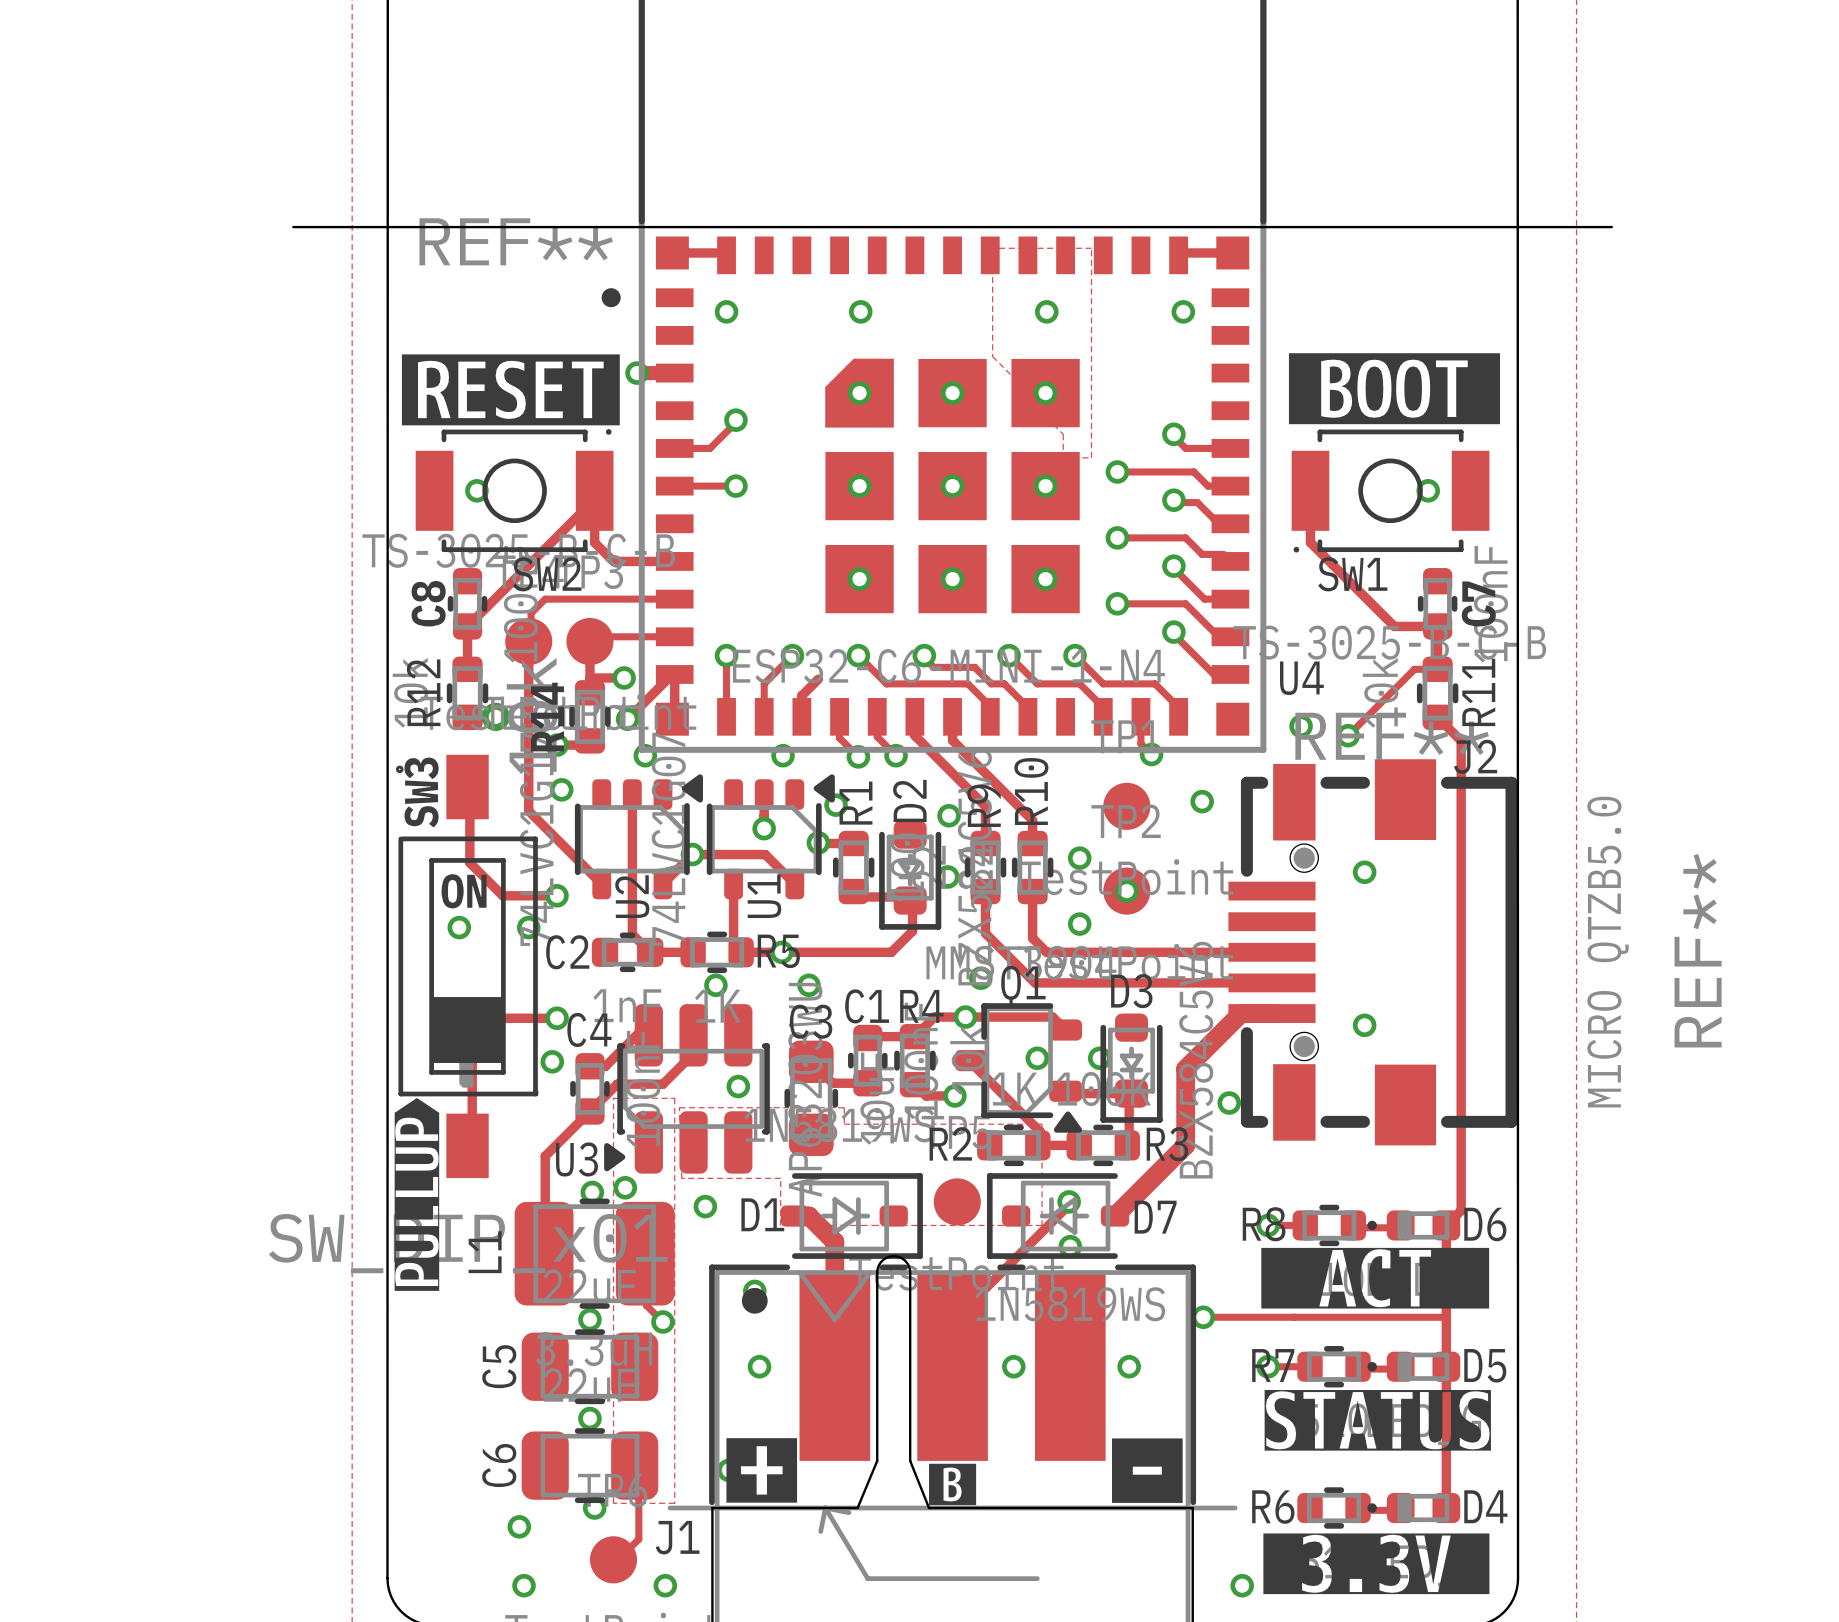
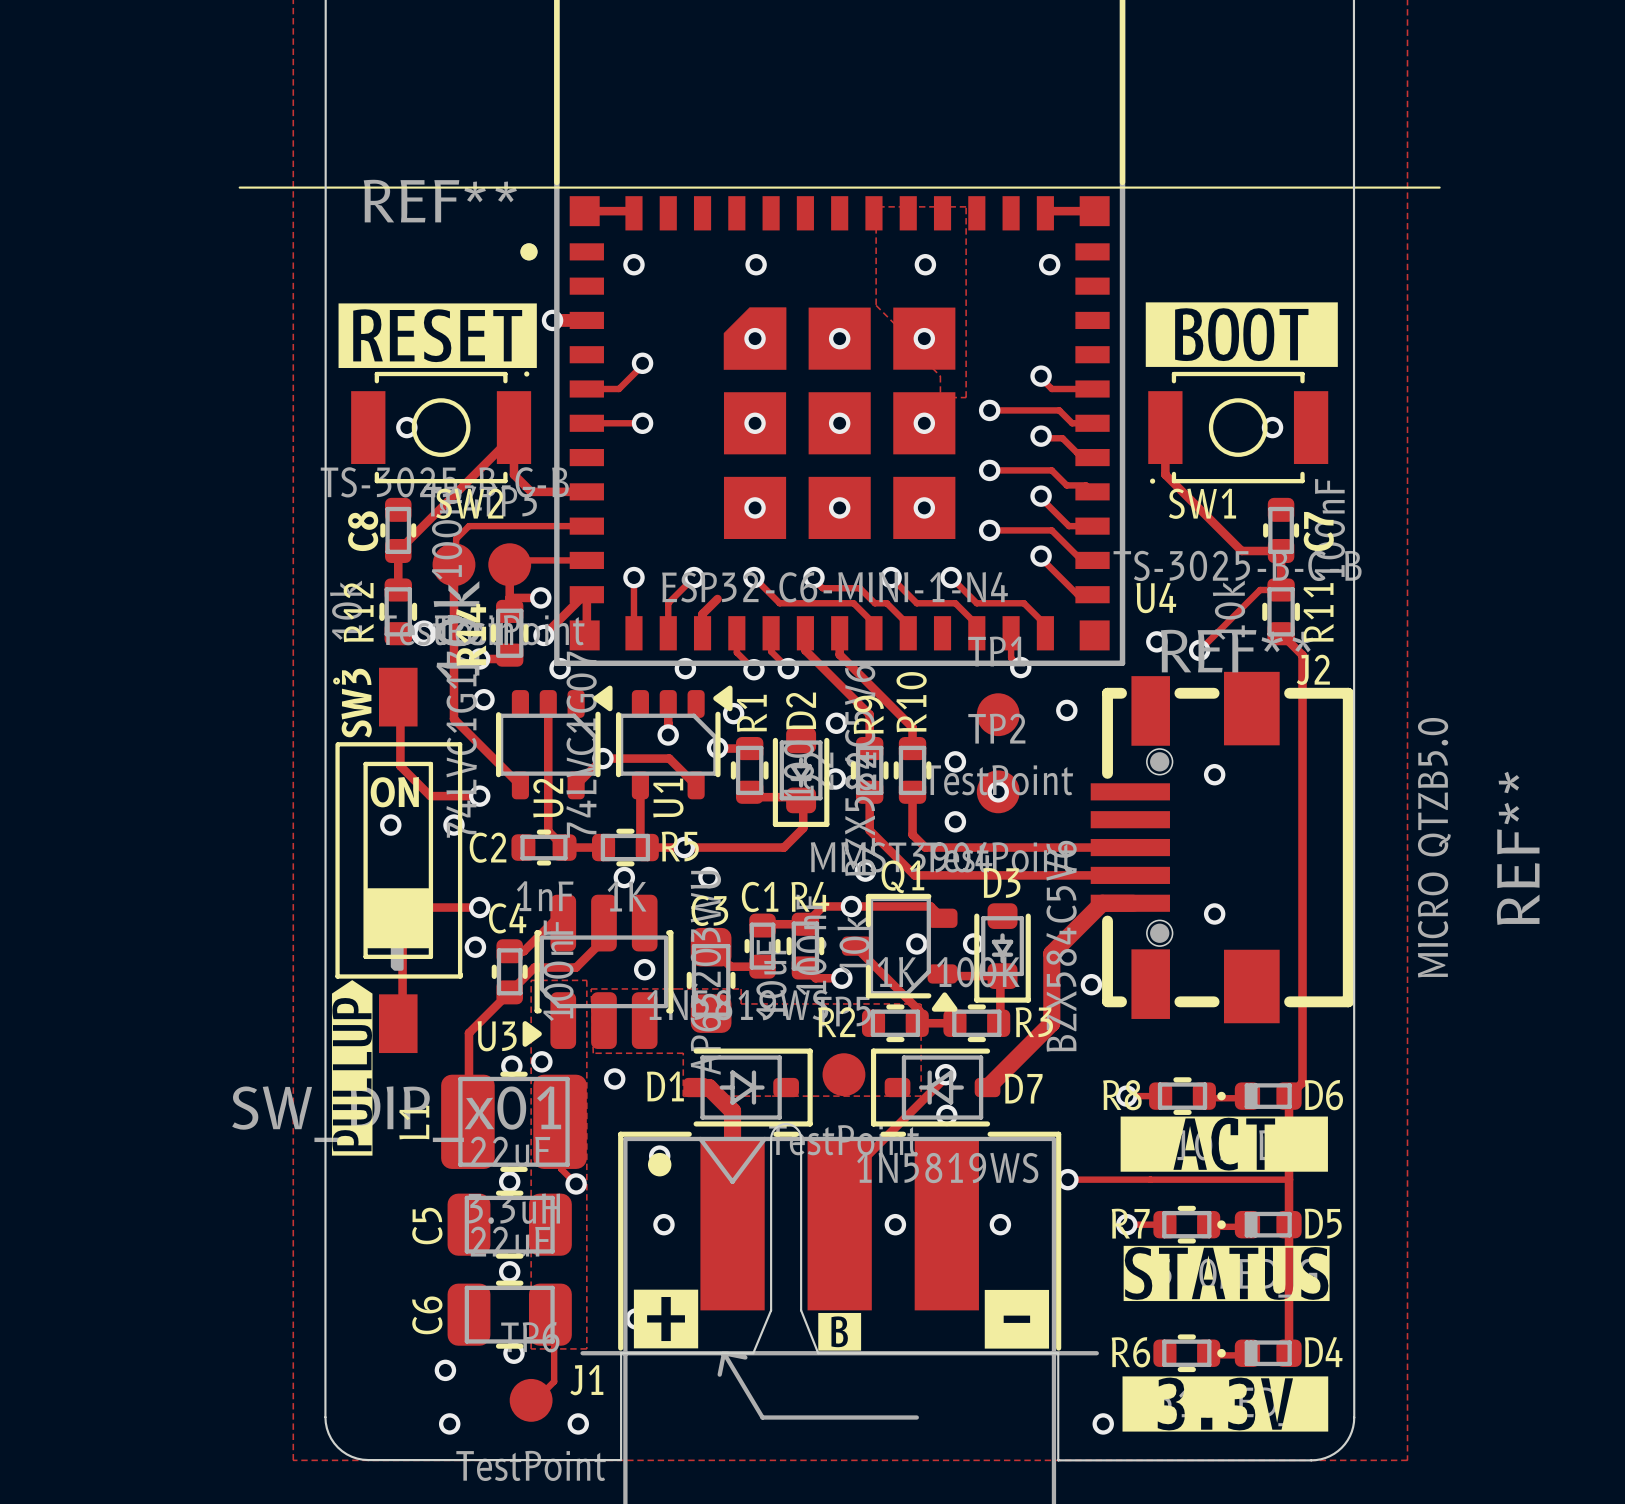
board edge: (293, 227) (1611, 227) -> none
line: none -> (239, 187) (1439, 187)

